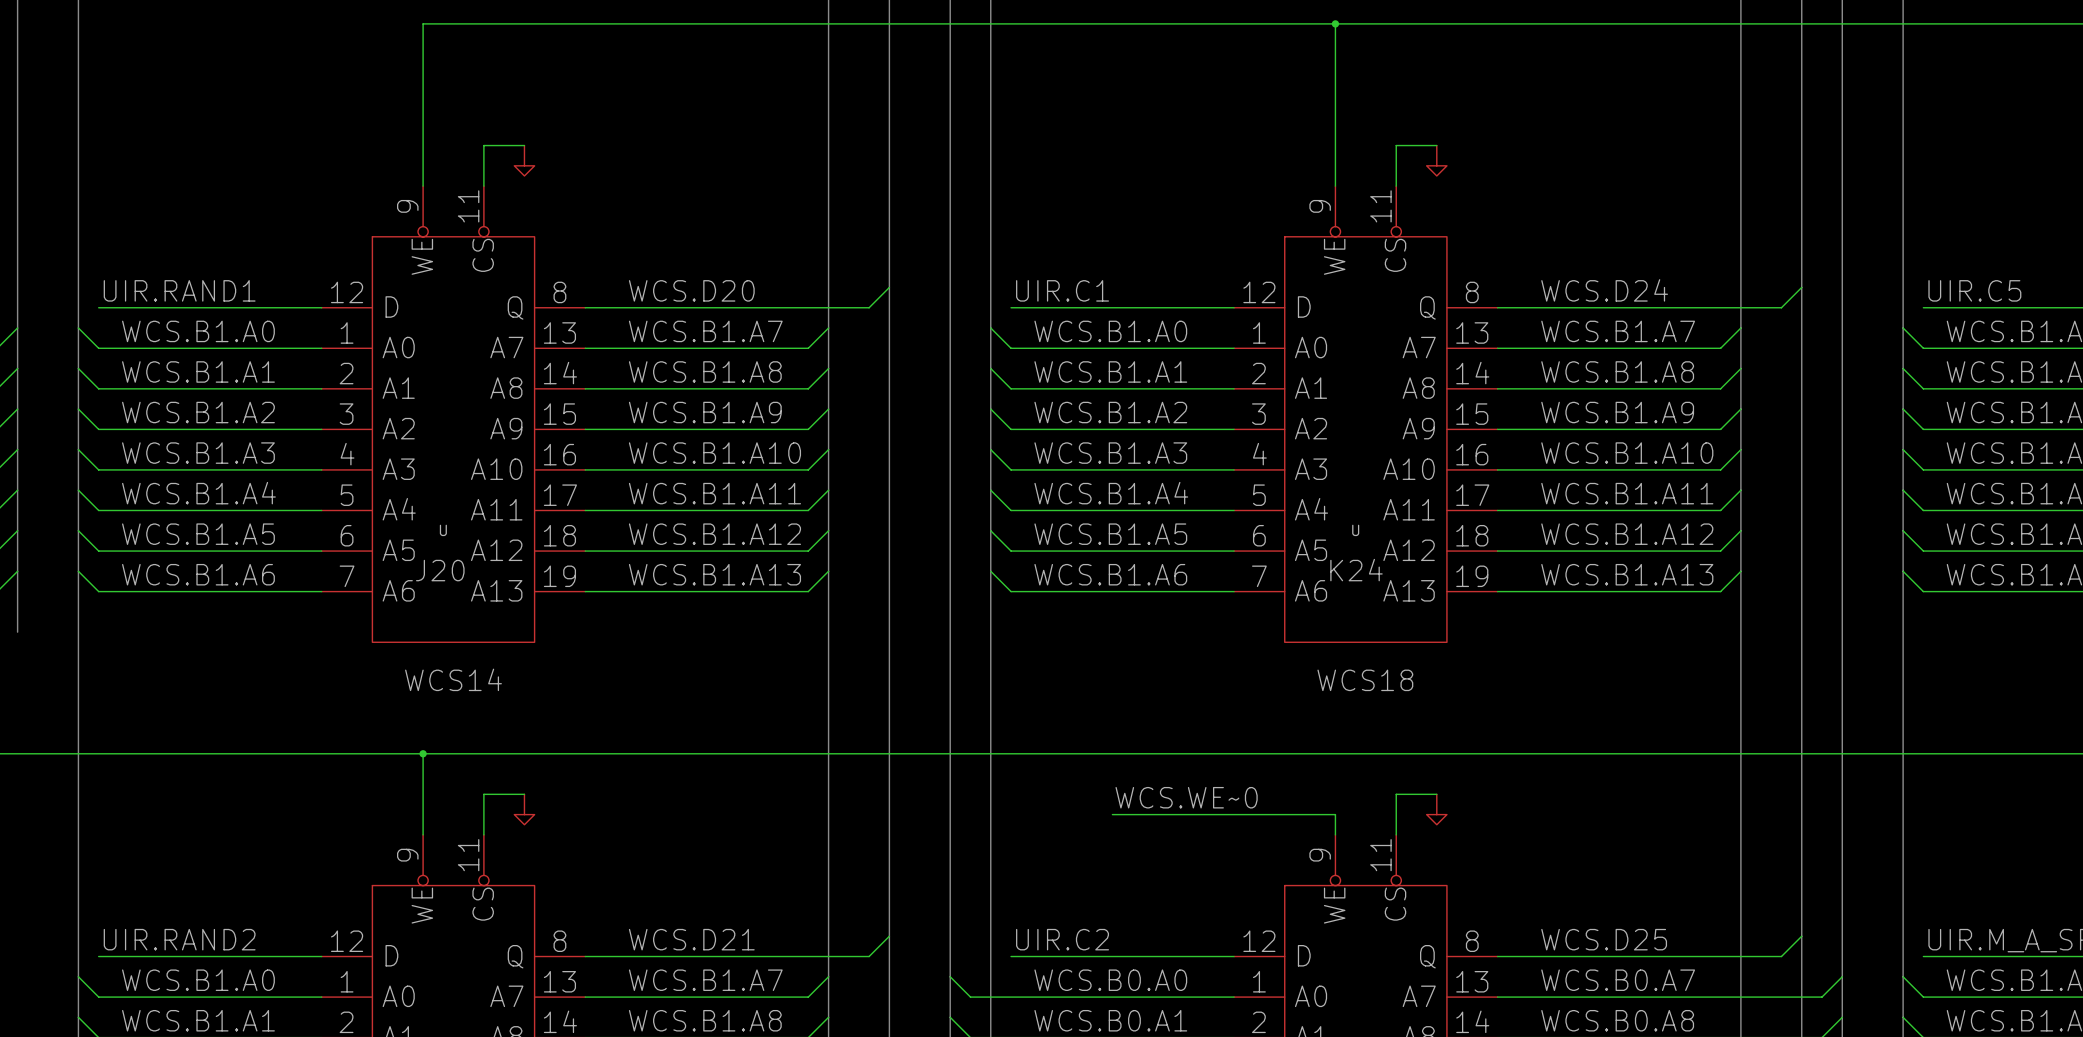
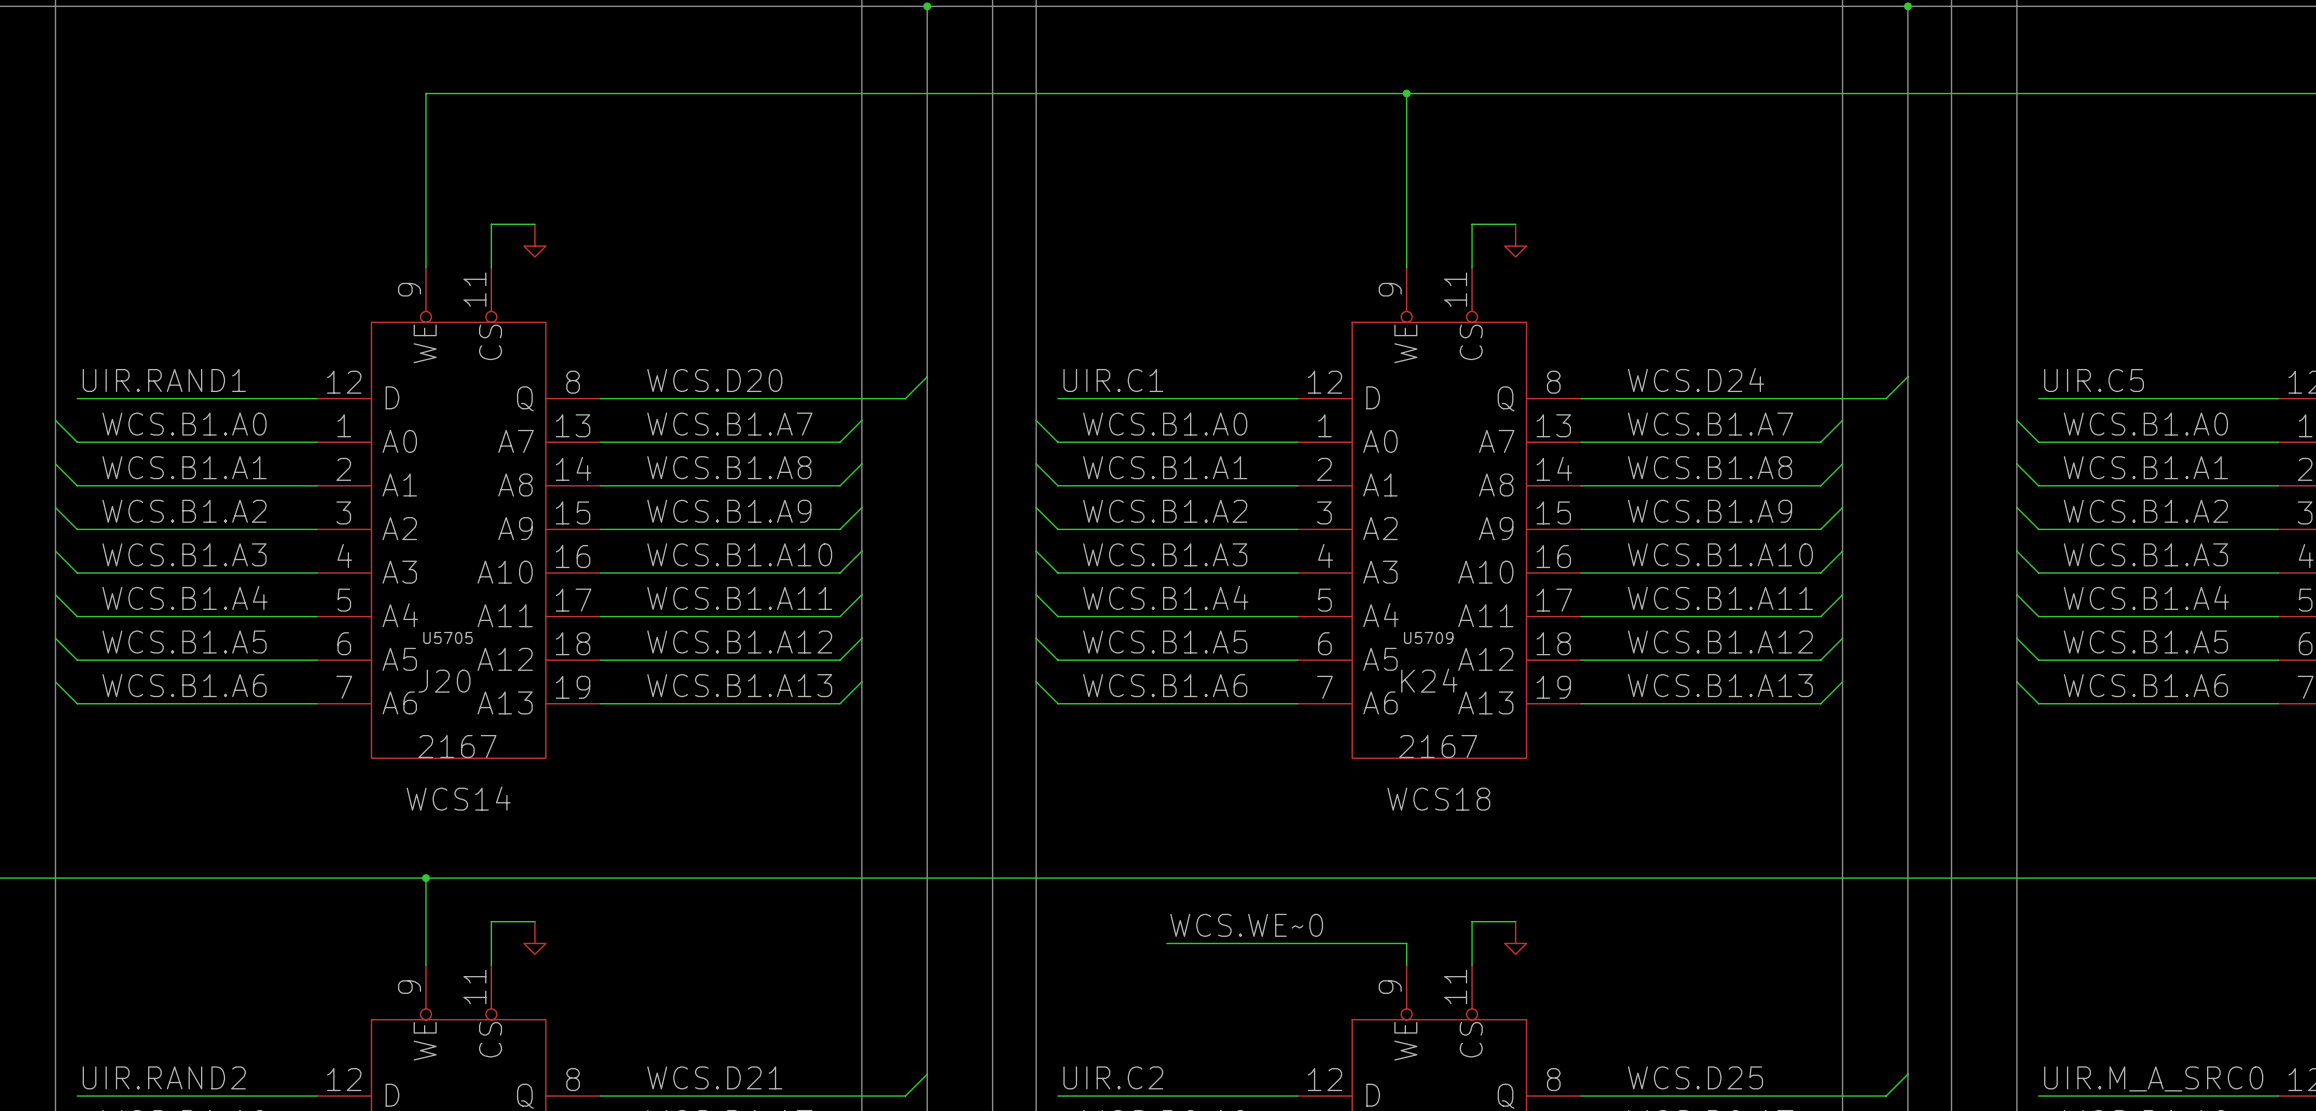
U name: U (443, 530) -> U5705 (448, 637)
U name: U (1355, 530) -> U5709 (1428, 637)
U value: none -> 2167 (457, 746)
U value: none -> 2167 (1438, 746)

